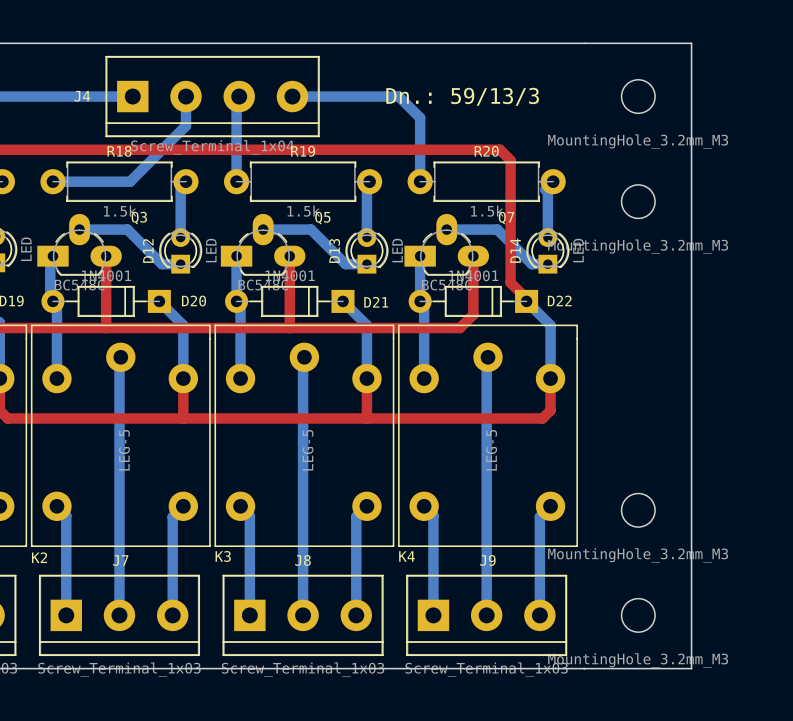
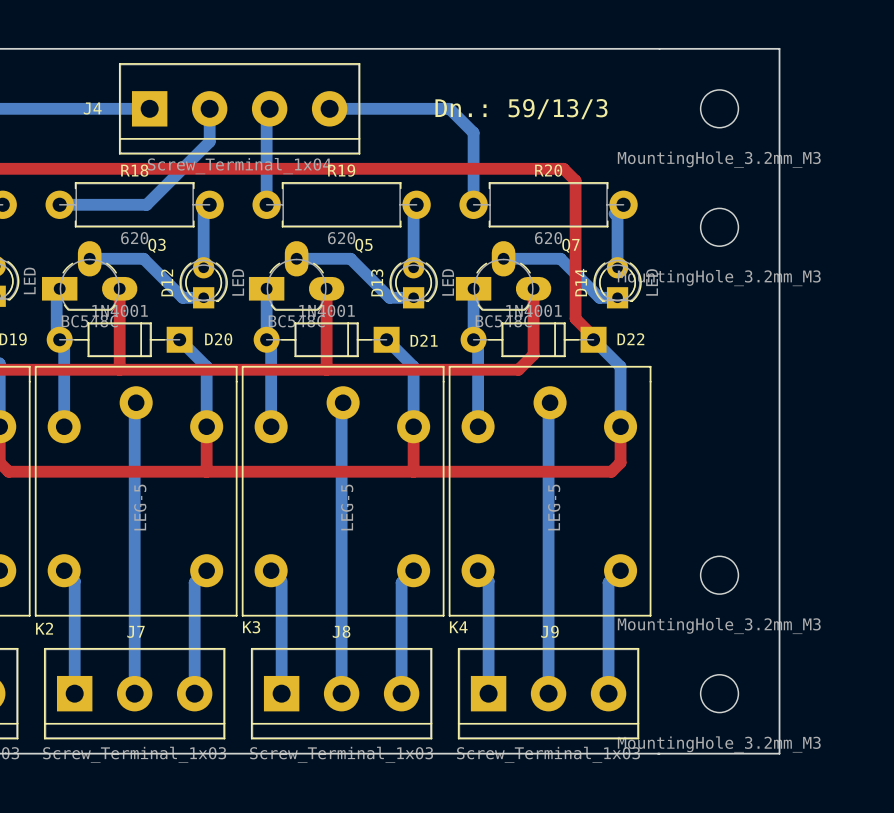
R18 value: 1.5k (120, 211) -> 620 (134, 238)
R19 value: 1.5k (303, 211) -> 620 (341, 238)
R20 value: 1.5k (487, 211) -> 620 (548, 238)

